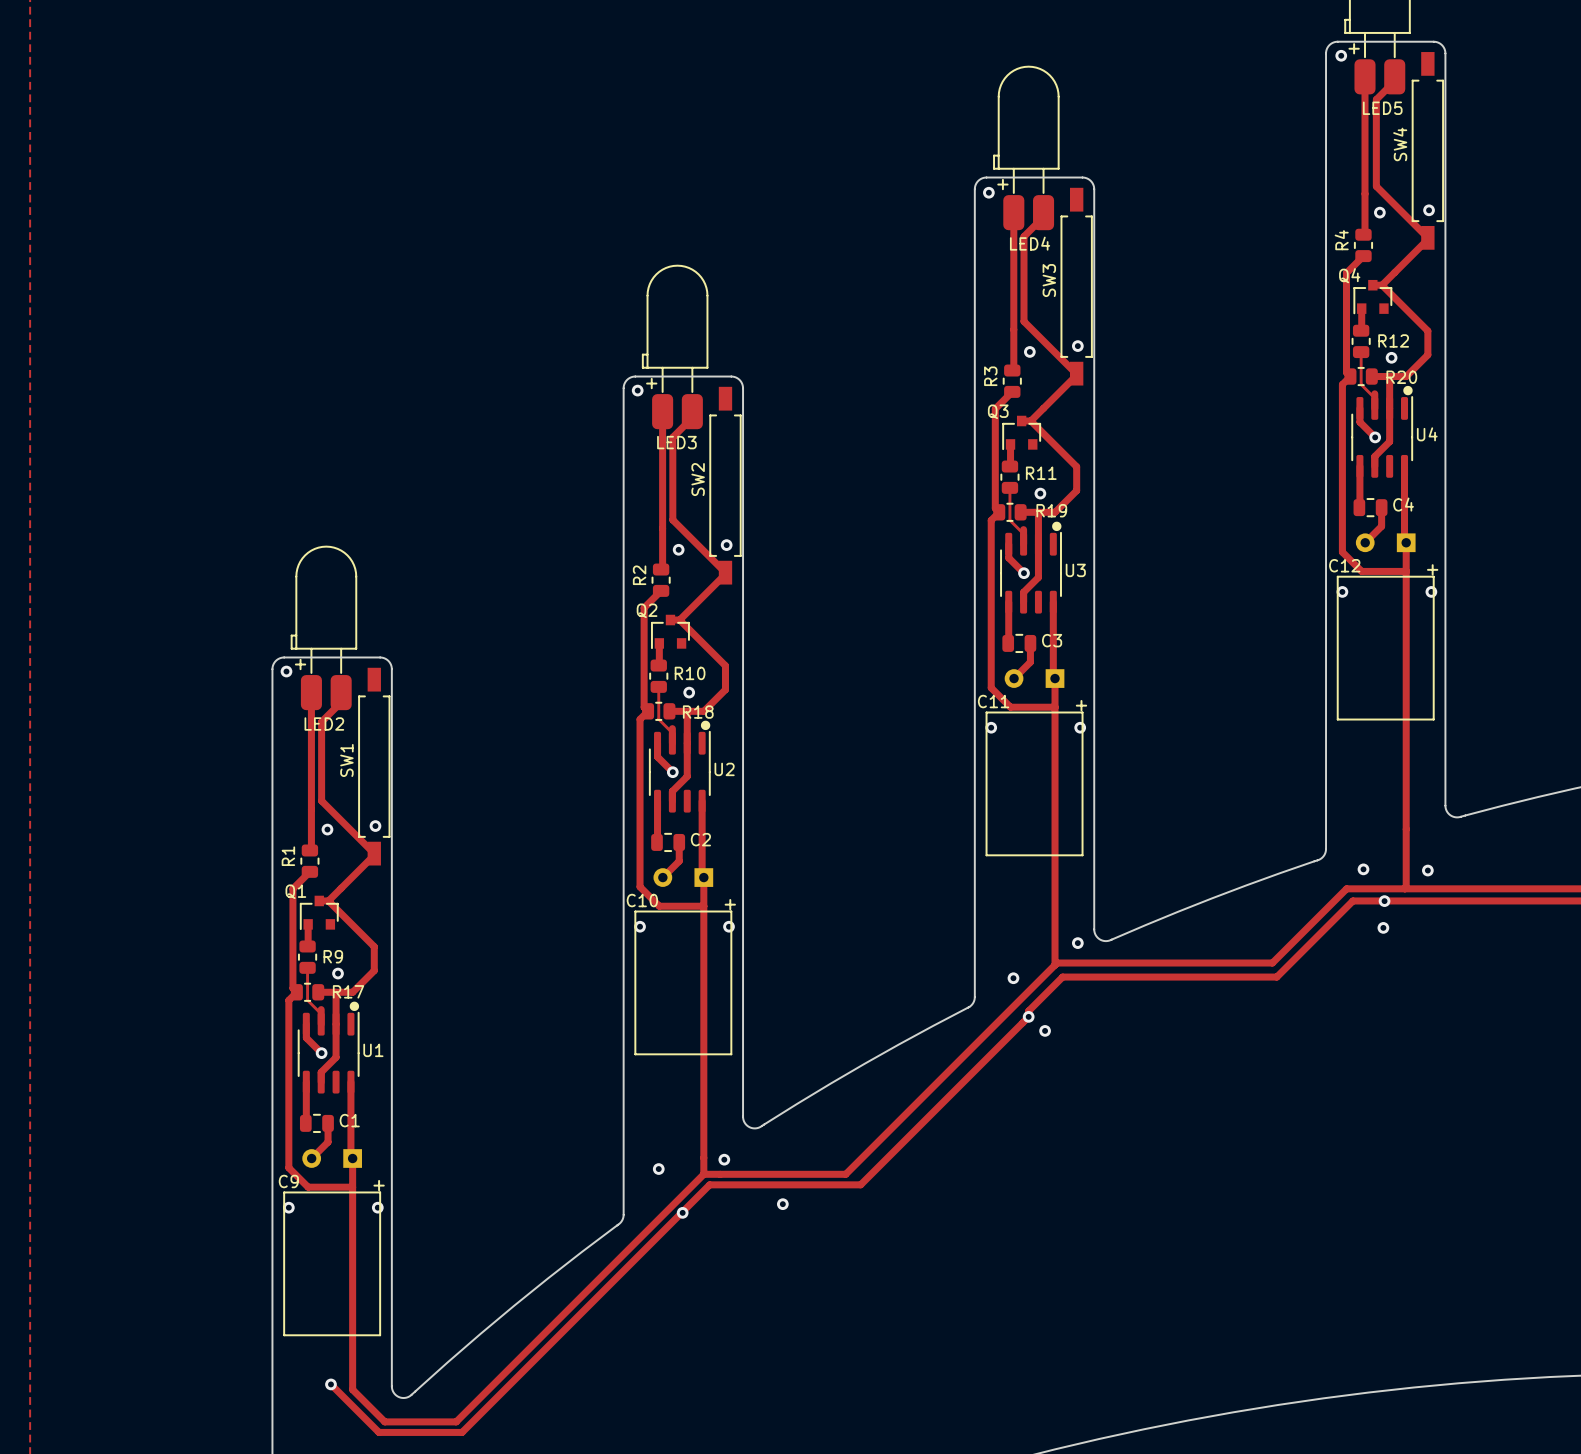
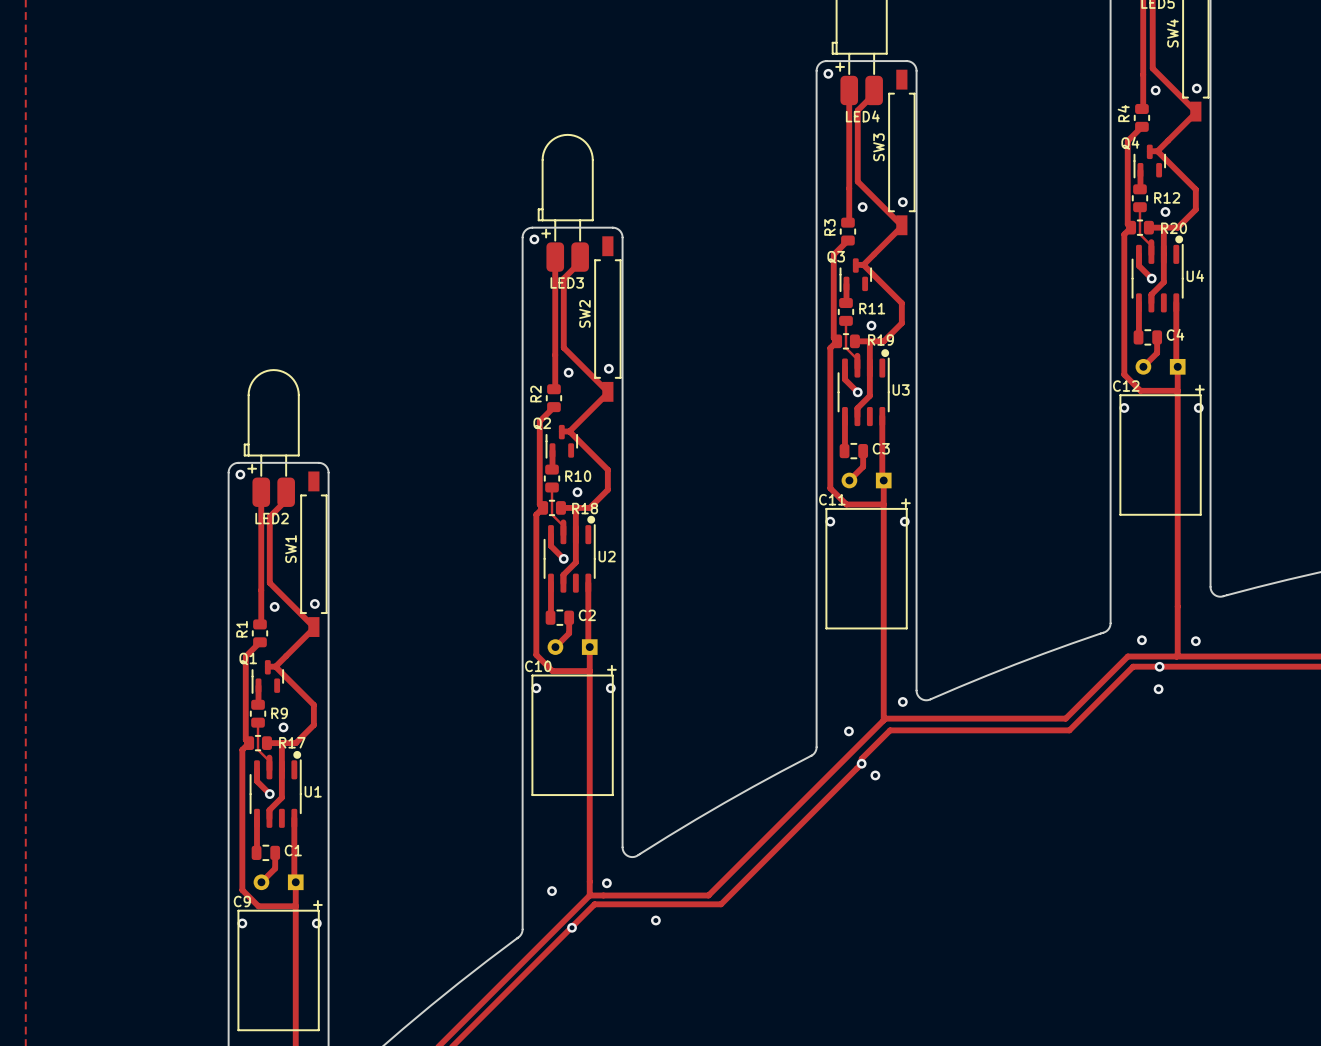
Q4 footprint: [1353, 279, 1393, 315] -> [1133, 144, 1166, 179]
Q3 footprint: [1002, 415, 1041, 450] -> [839, 258, 872, 292]
Q2 footprint: [651, 614, 690, 649] -> [545, 424, 578, 459]
Q1 footprint: [300, 895, 339, 930] -> [251, 660, 284, 694]

